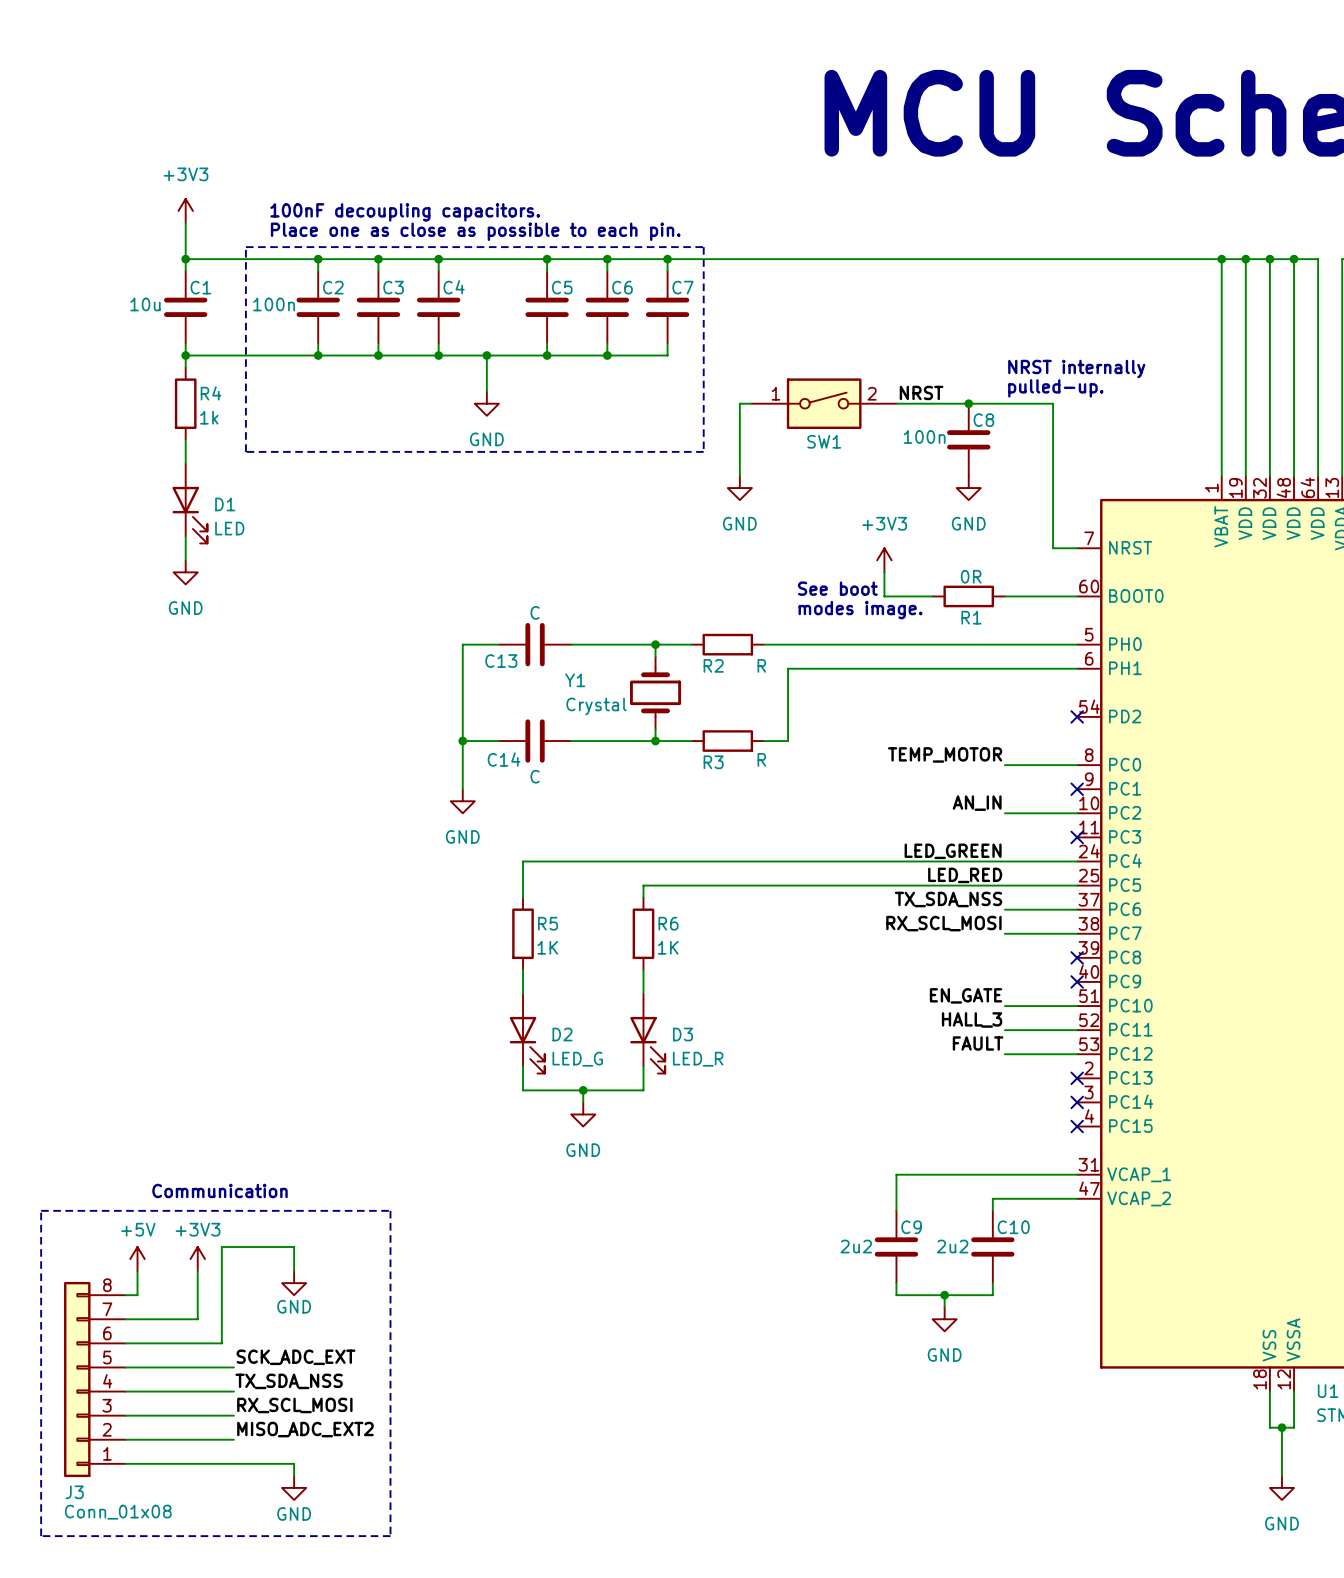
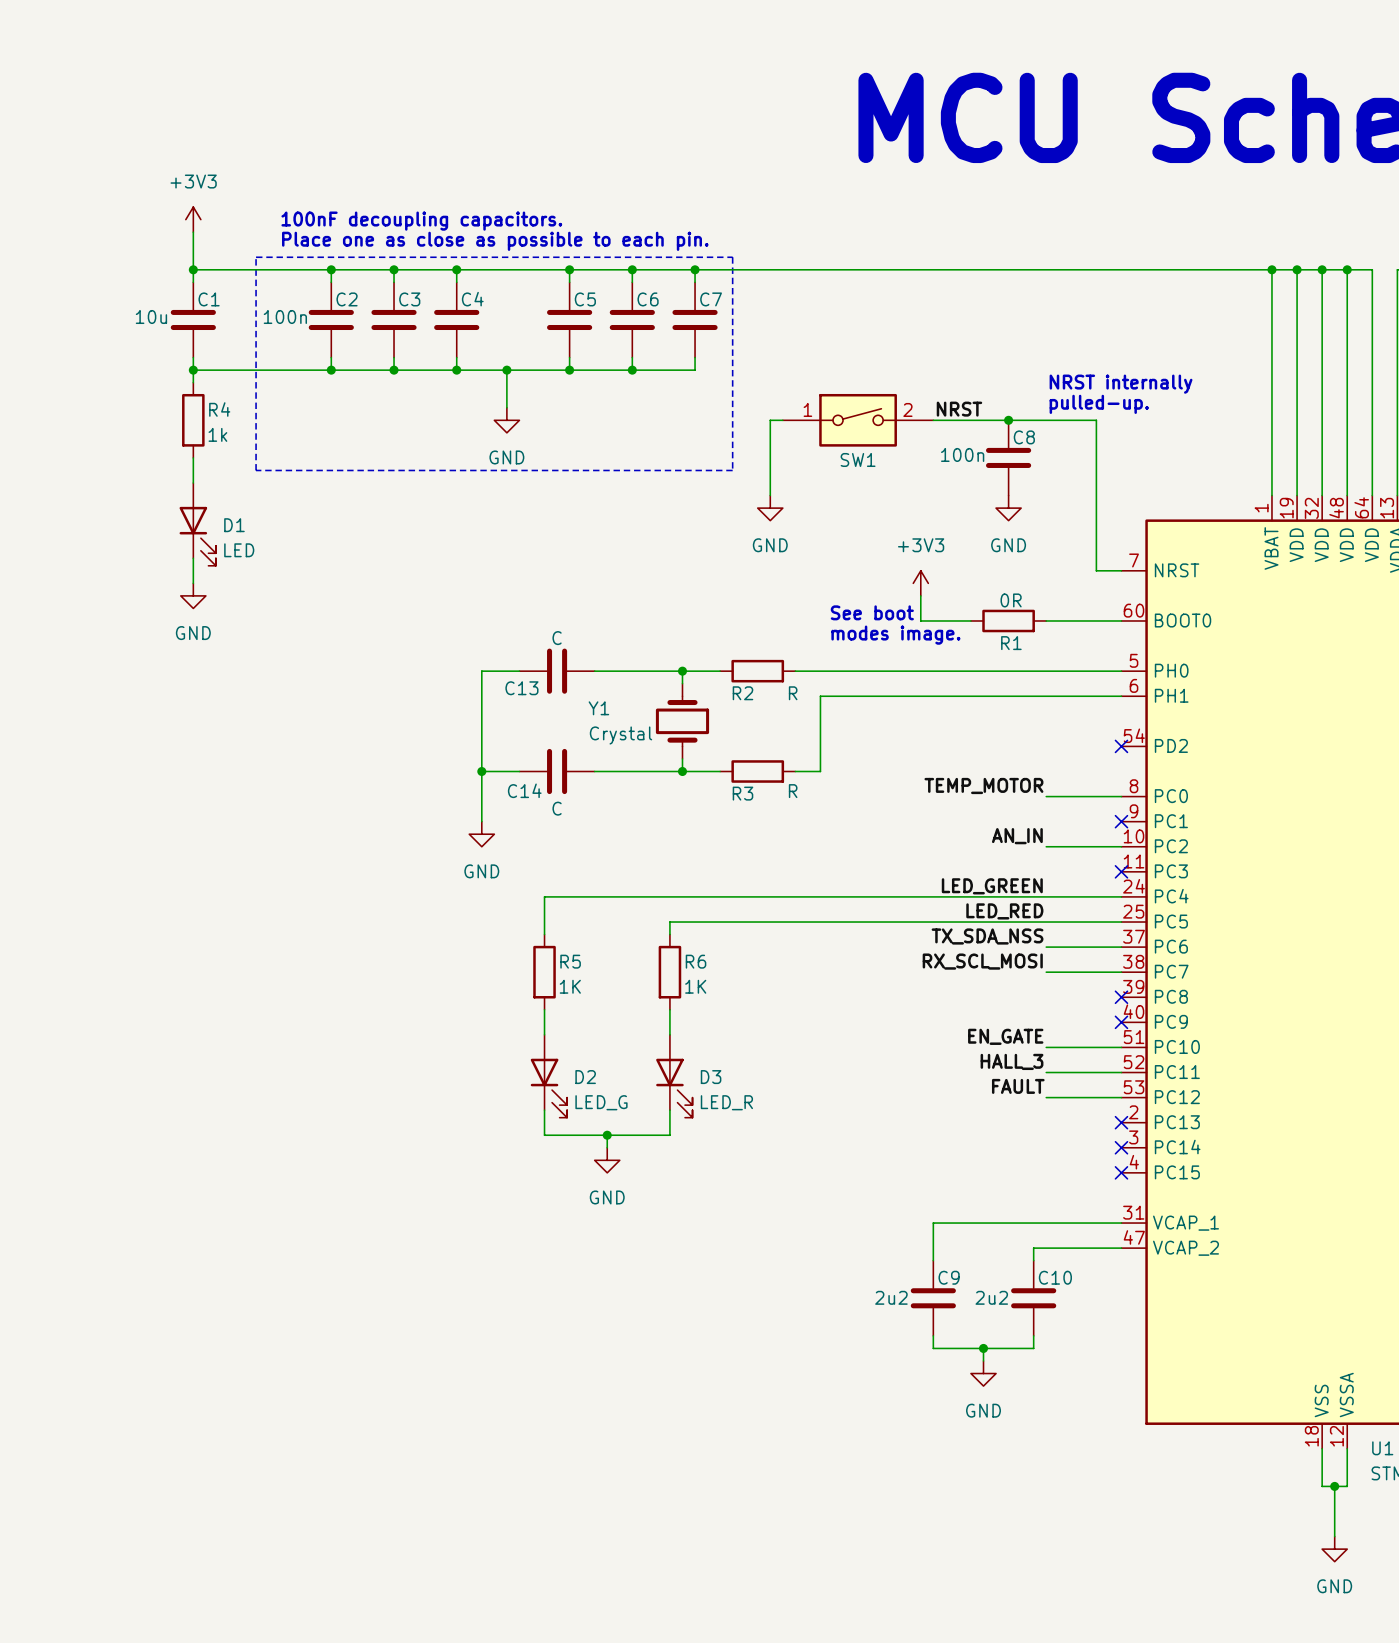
text: Communication (219, 1190) -> none
line: (41, 1210) (390, 1210) (390, 1536) (41, 1536) (41, 1210) -> none
power symbol: +5V (137, 1259) -> none
power symbol: +3V3 (197, 1259) -> none
wire: (137, 1271) (137, 1295) (125, 1295) -> none
wire: (197, 1271) (197, 1319) (125, 1319) -> none
wire: (294, 1271) (294, 1246) (221, 1246) (221, 1343) (125, 1343) -> none
power symbol: GND (294, 1283) -> none
label: SCK_ADC_EXT (295, 1357) -> none
wire: (125, 1367) (233, 1367) -> none
J3: Conn_01x08 (94, 1379) -> none
label: TX_SDA_NSS (289, 1381) -> none
wire: (125, 1391) (233, 1391) -> none
label: RX_SCL_MOSI (294, 1405) -> none
wire: (125, 1415) (233, 1415) -> none
label: MISO_ADC_EXT2 (305, 1429) -> none
wire: (125, 1439) (233, 1439) -> none
wire: (125, 1463) (294, 1463) (294, 1475) -> none
power symbol: GND (294, 1487) -> none

